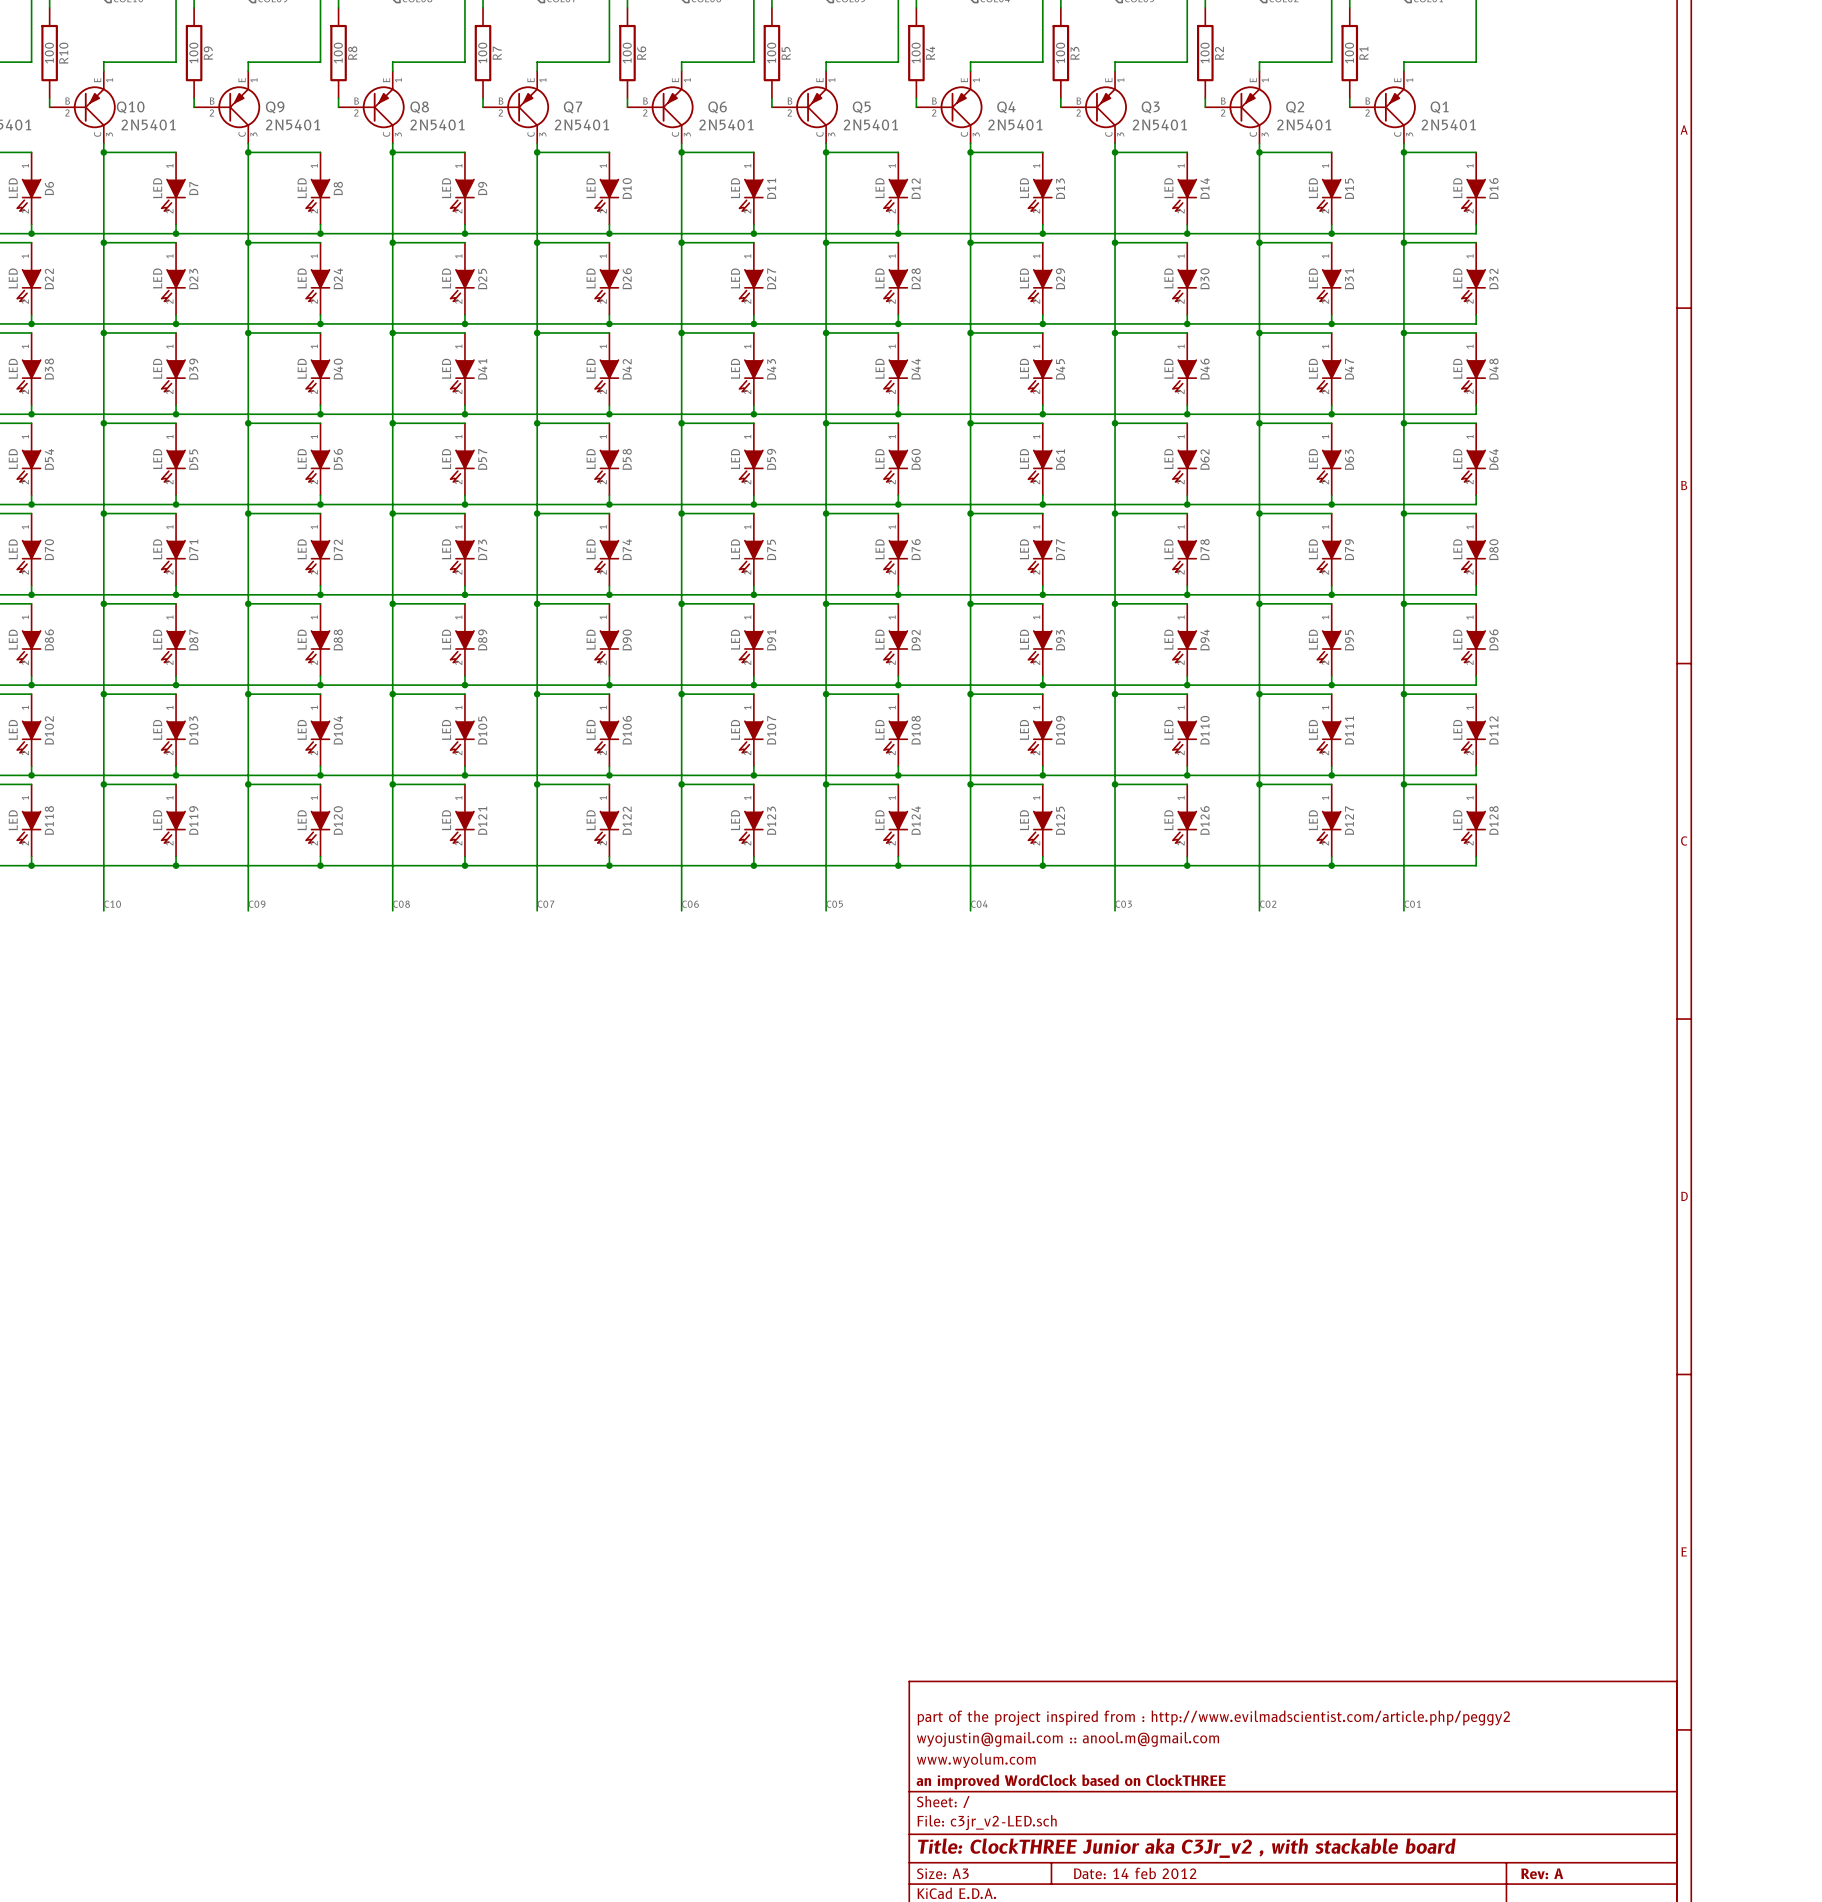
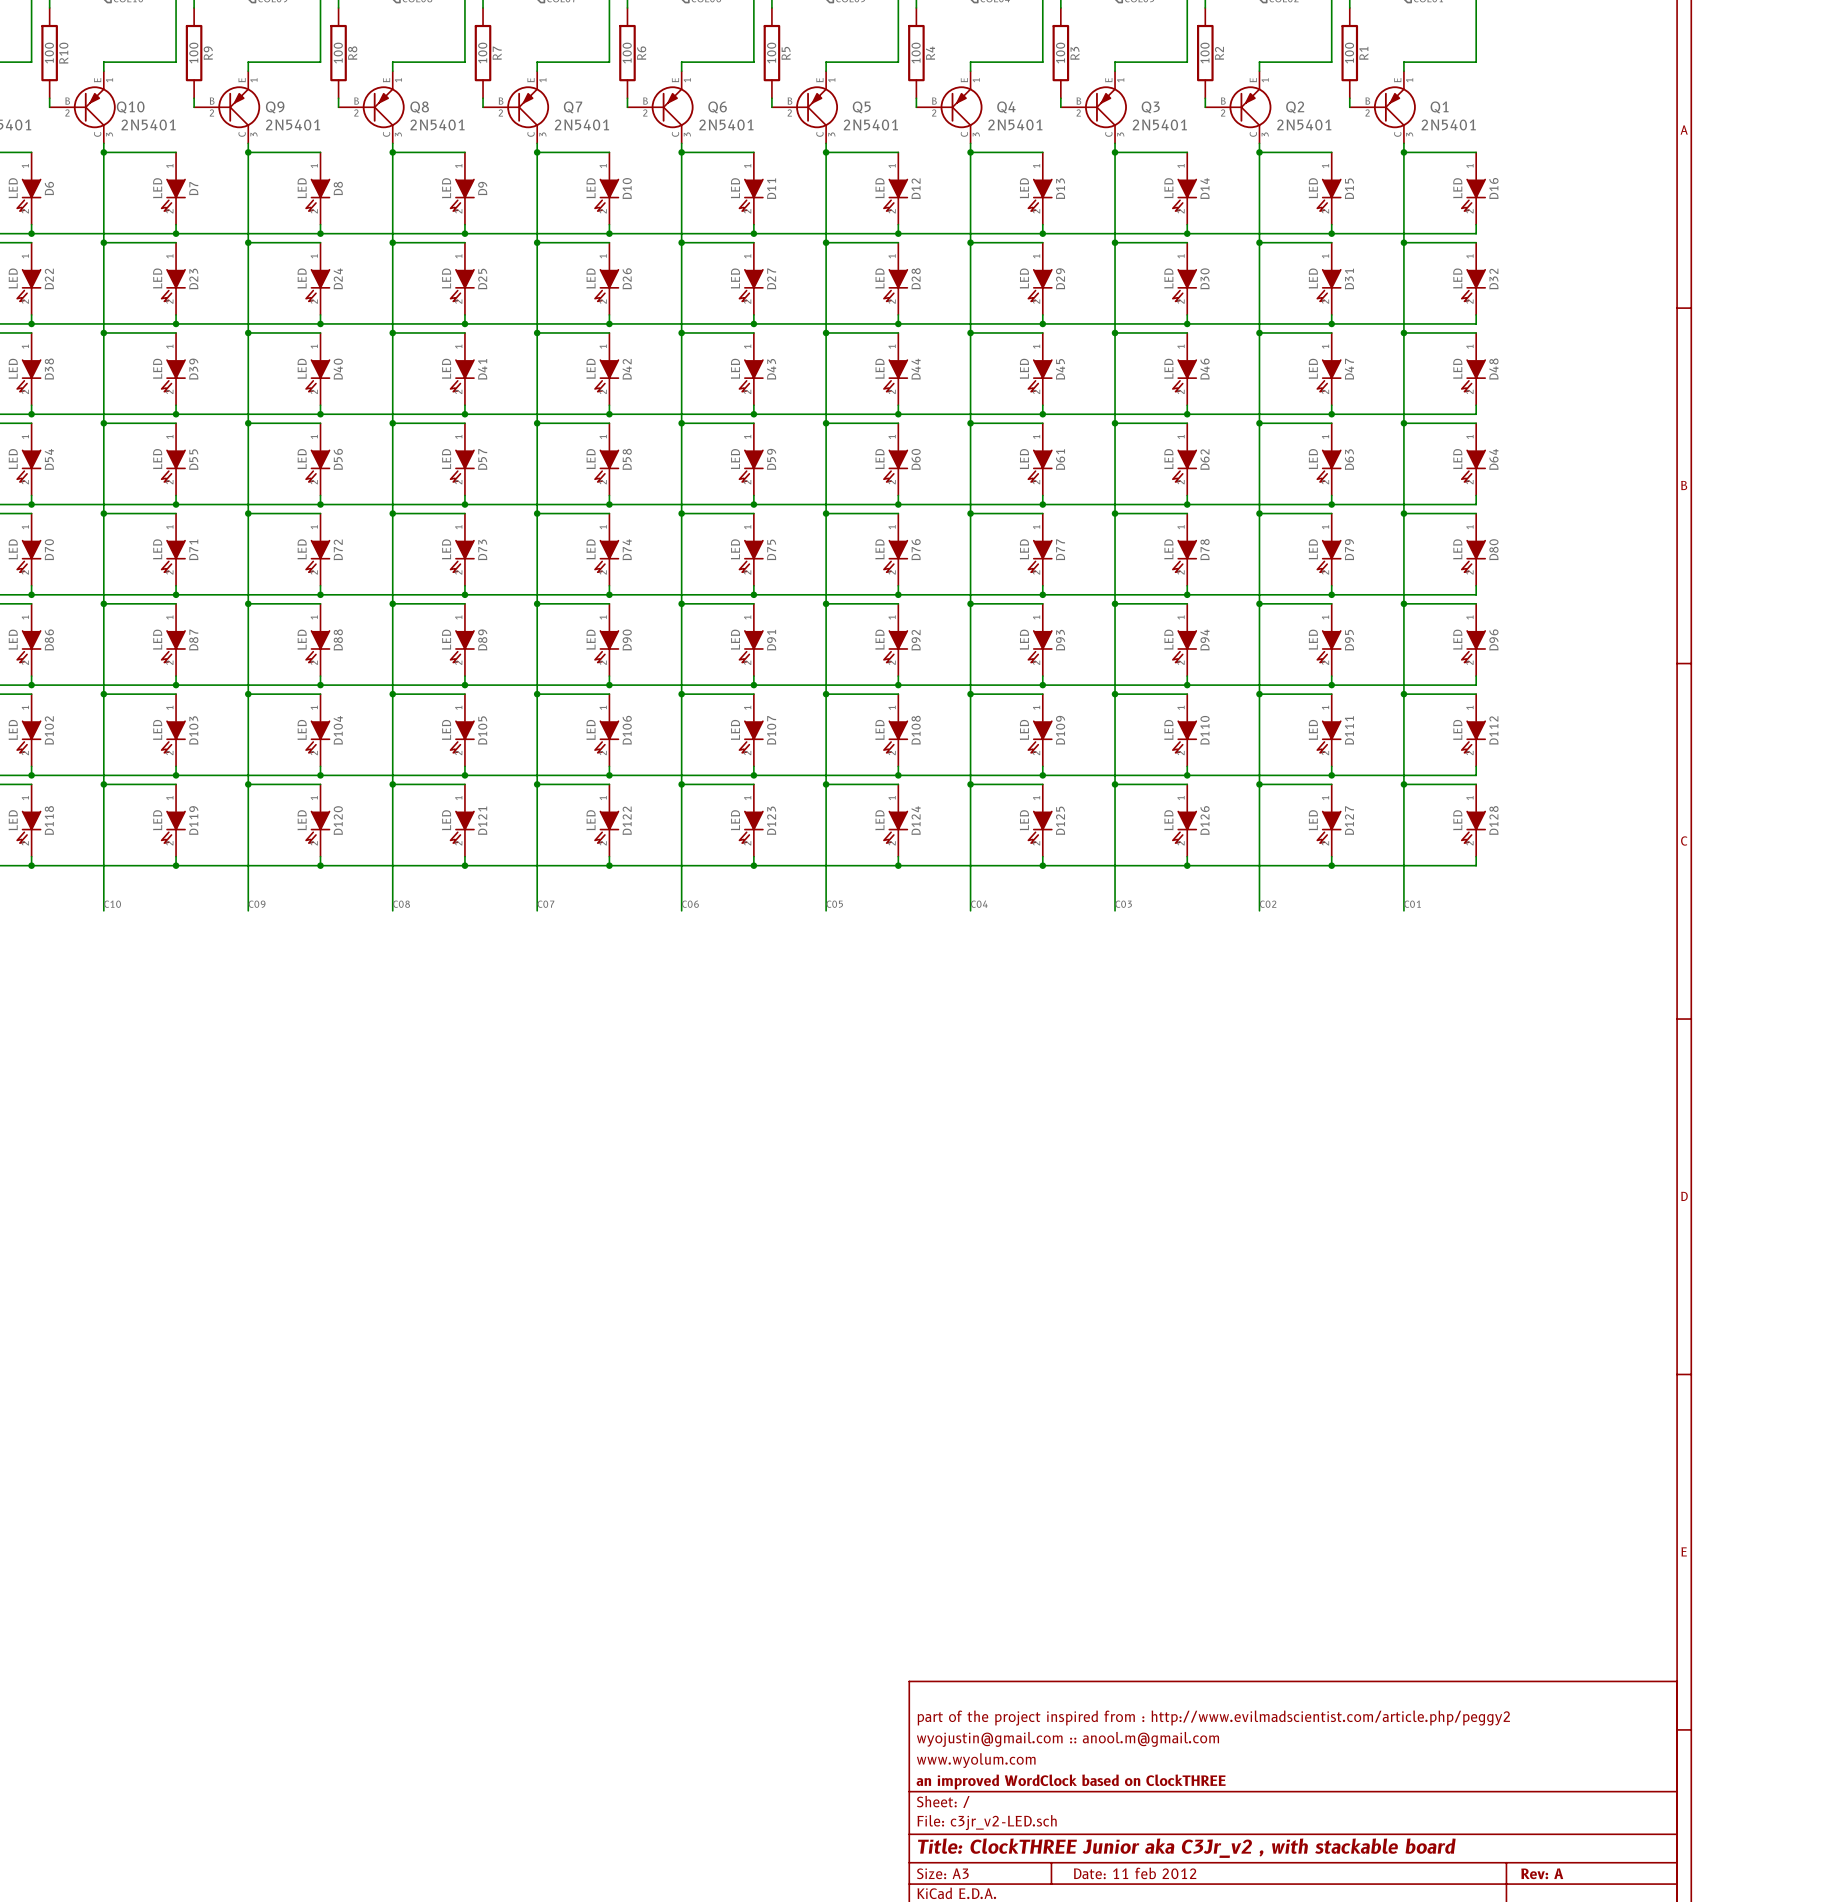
title block: Date: 14 feb 2012 (1135, 1873) -> Date: 11 feb 2012 (1135, 1873)

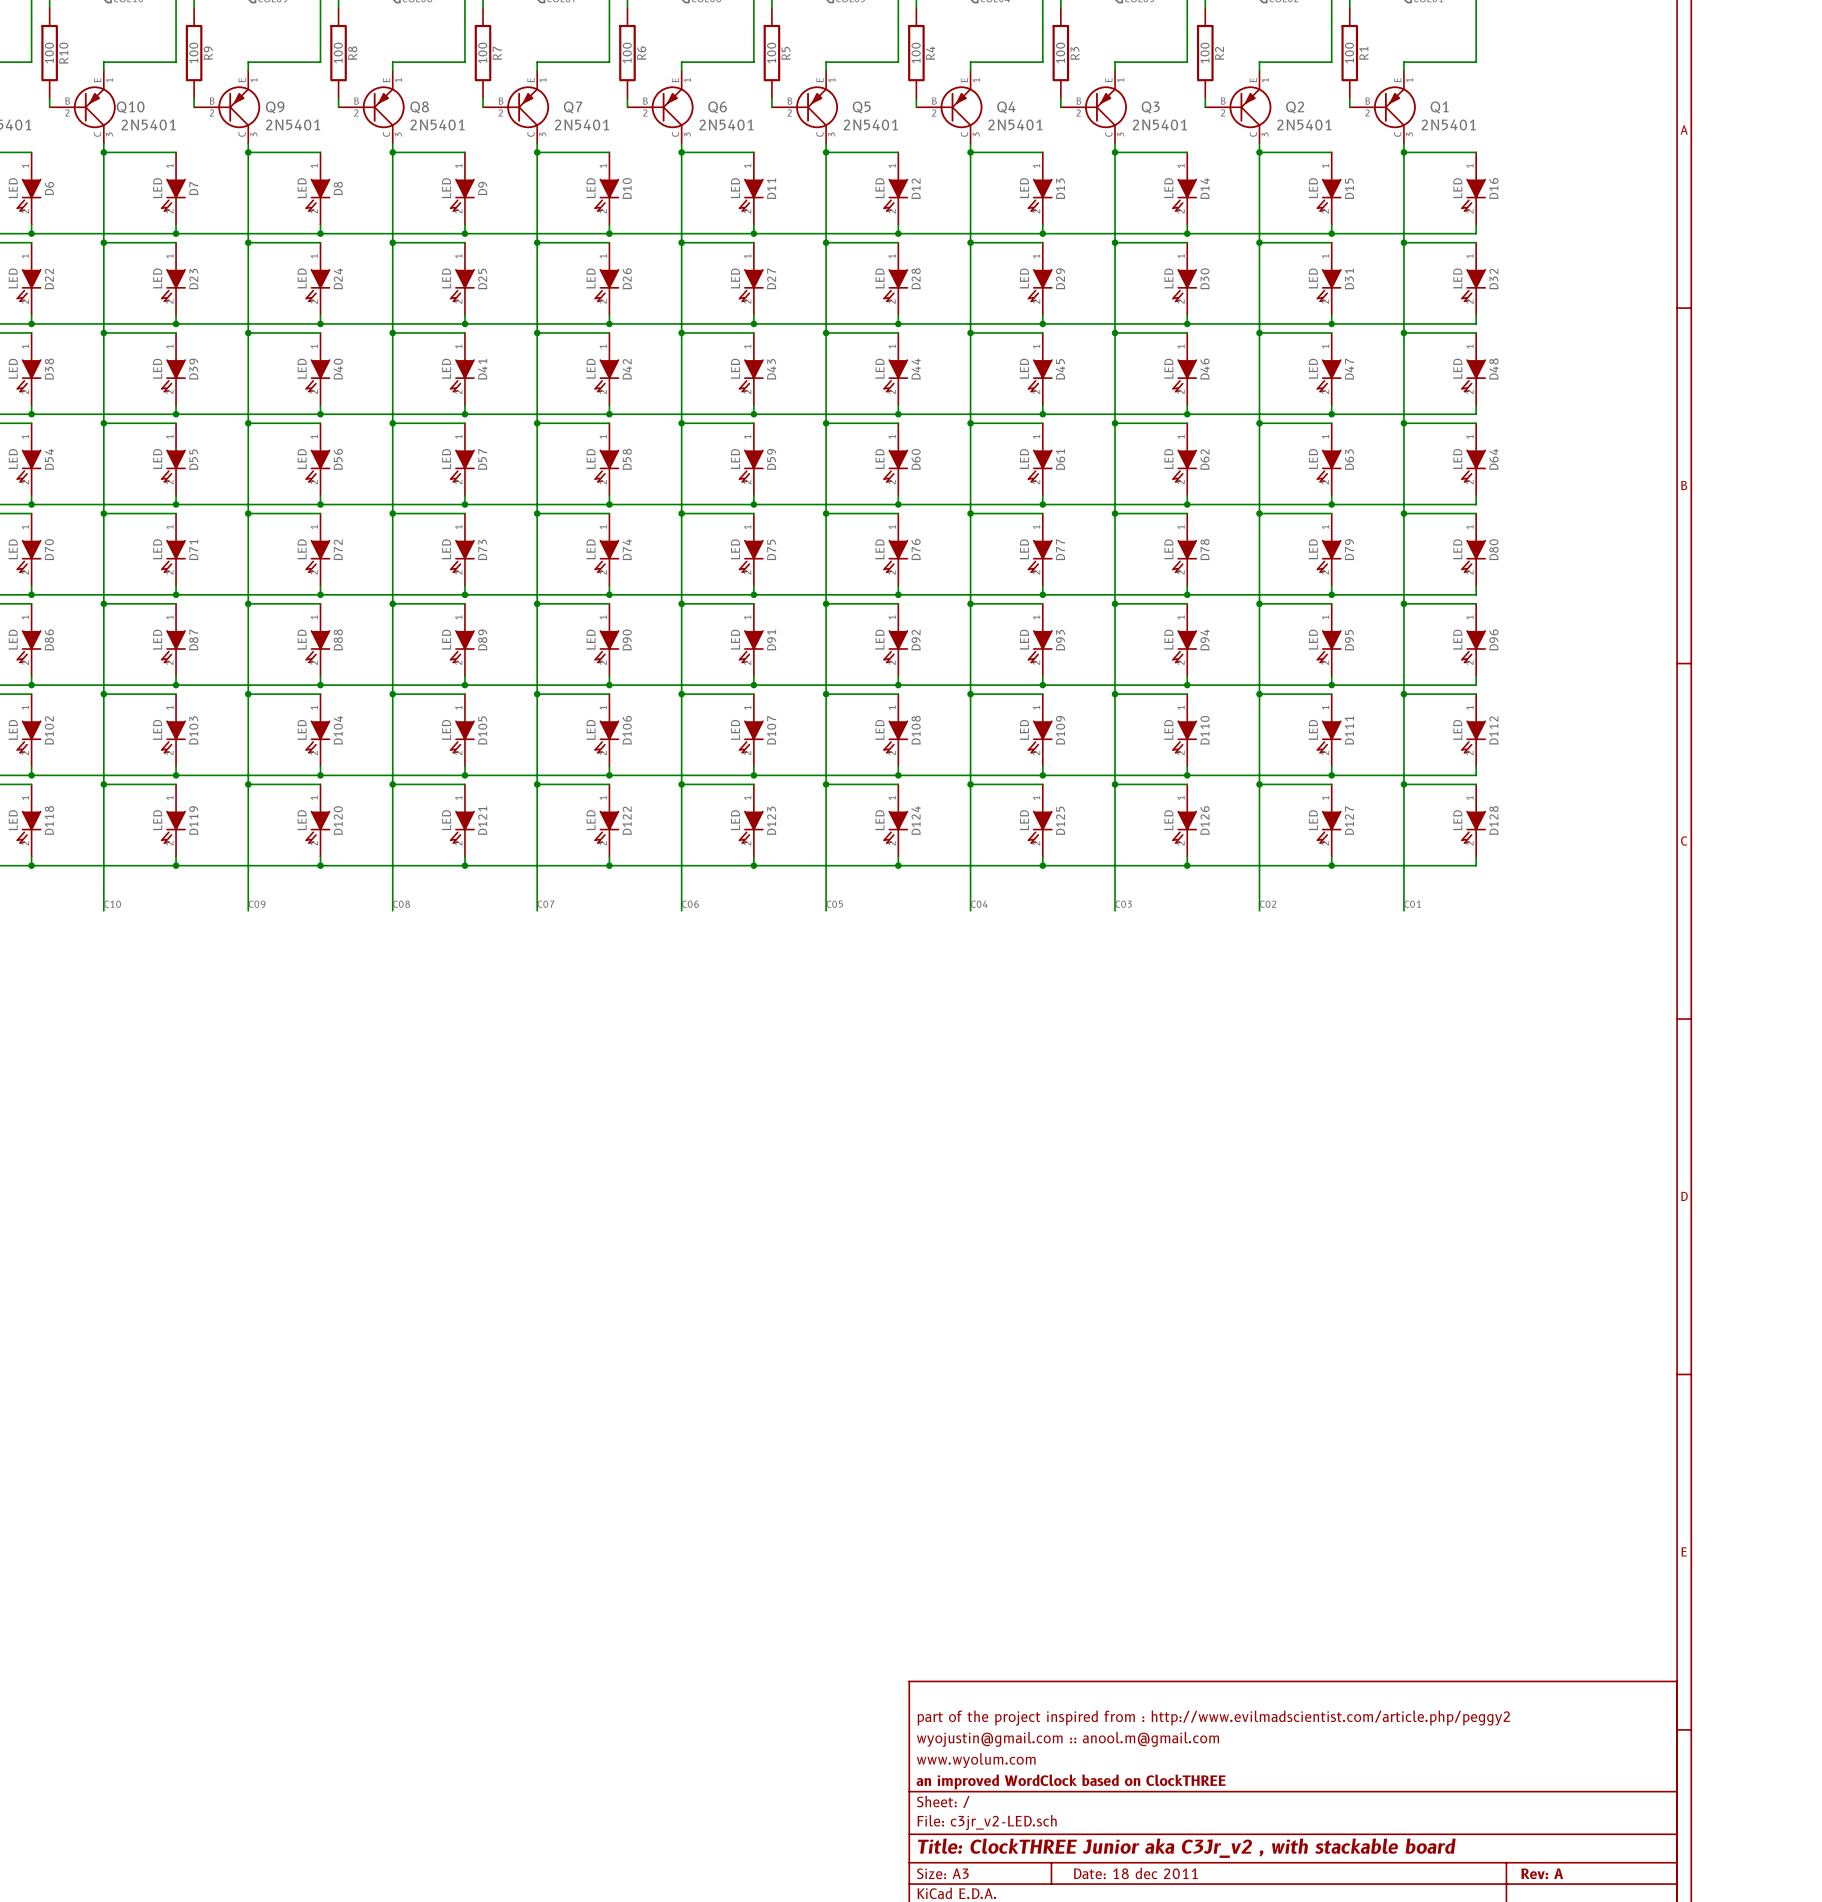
title block: Date: 11 feb 2012 (1135, 1873) -> Date: 18 dec 2011 (1135, 1873)

